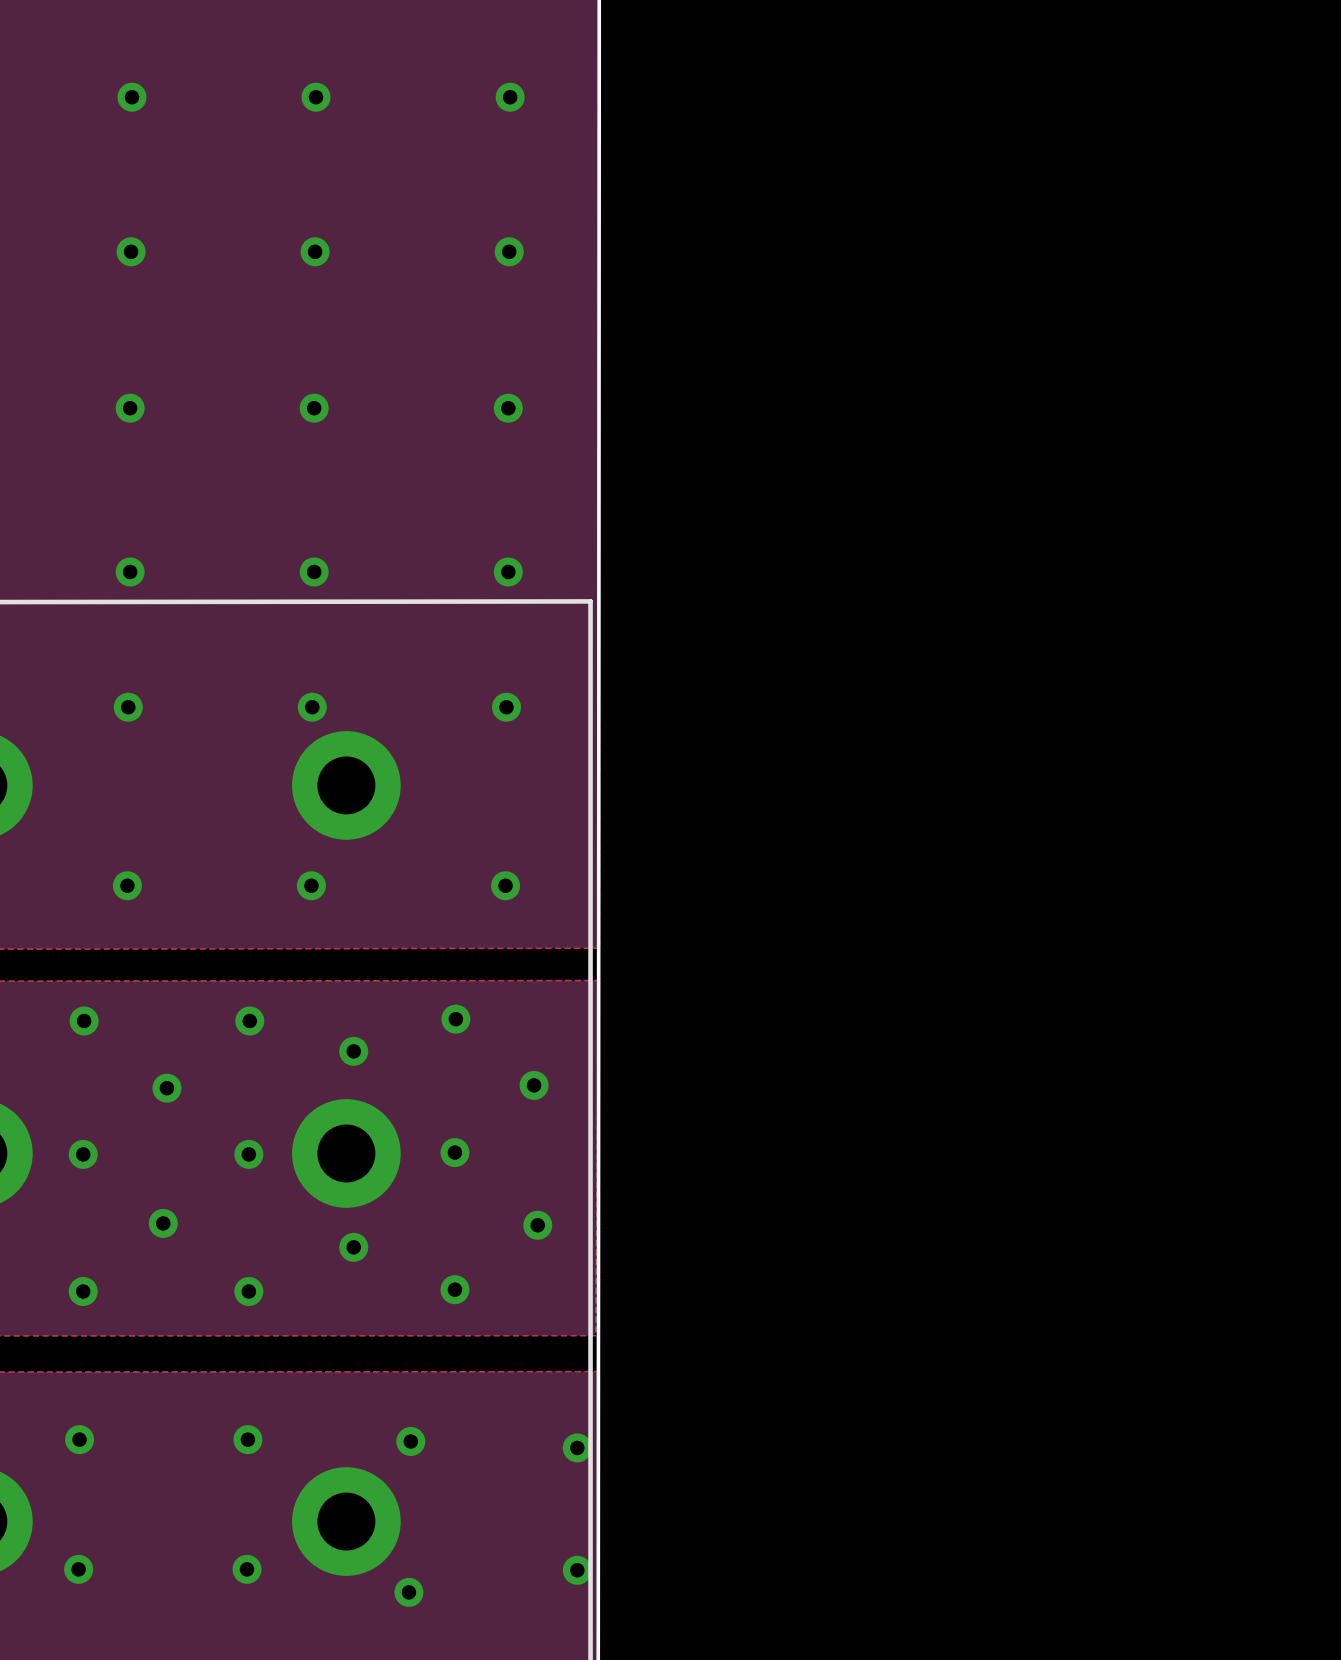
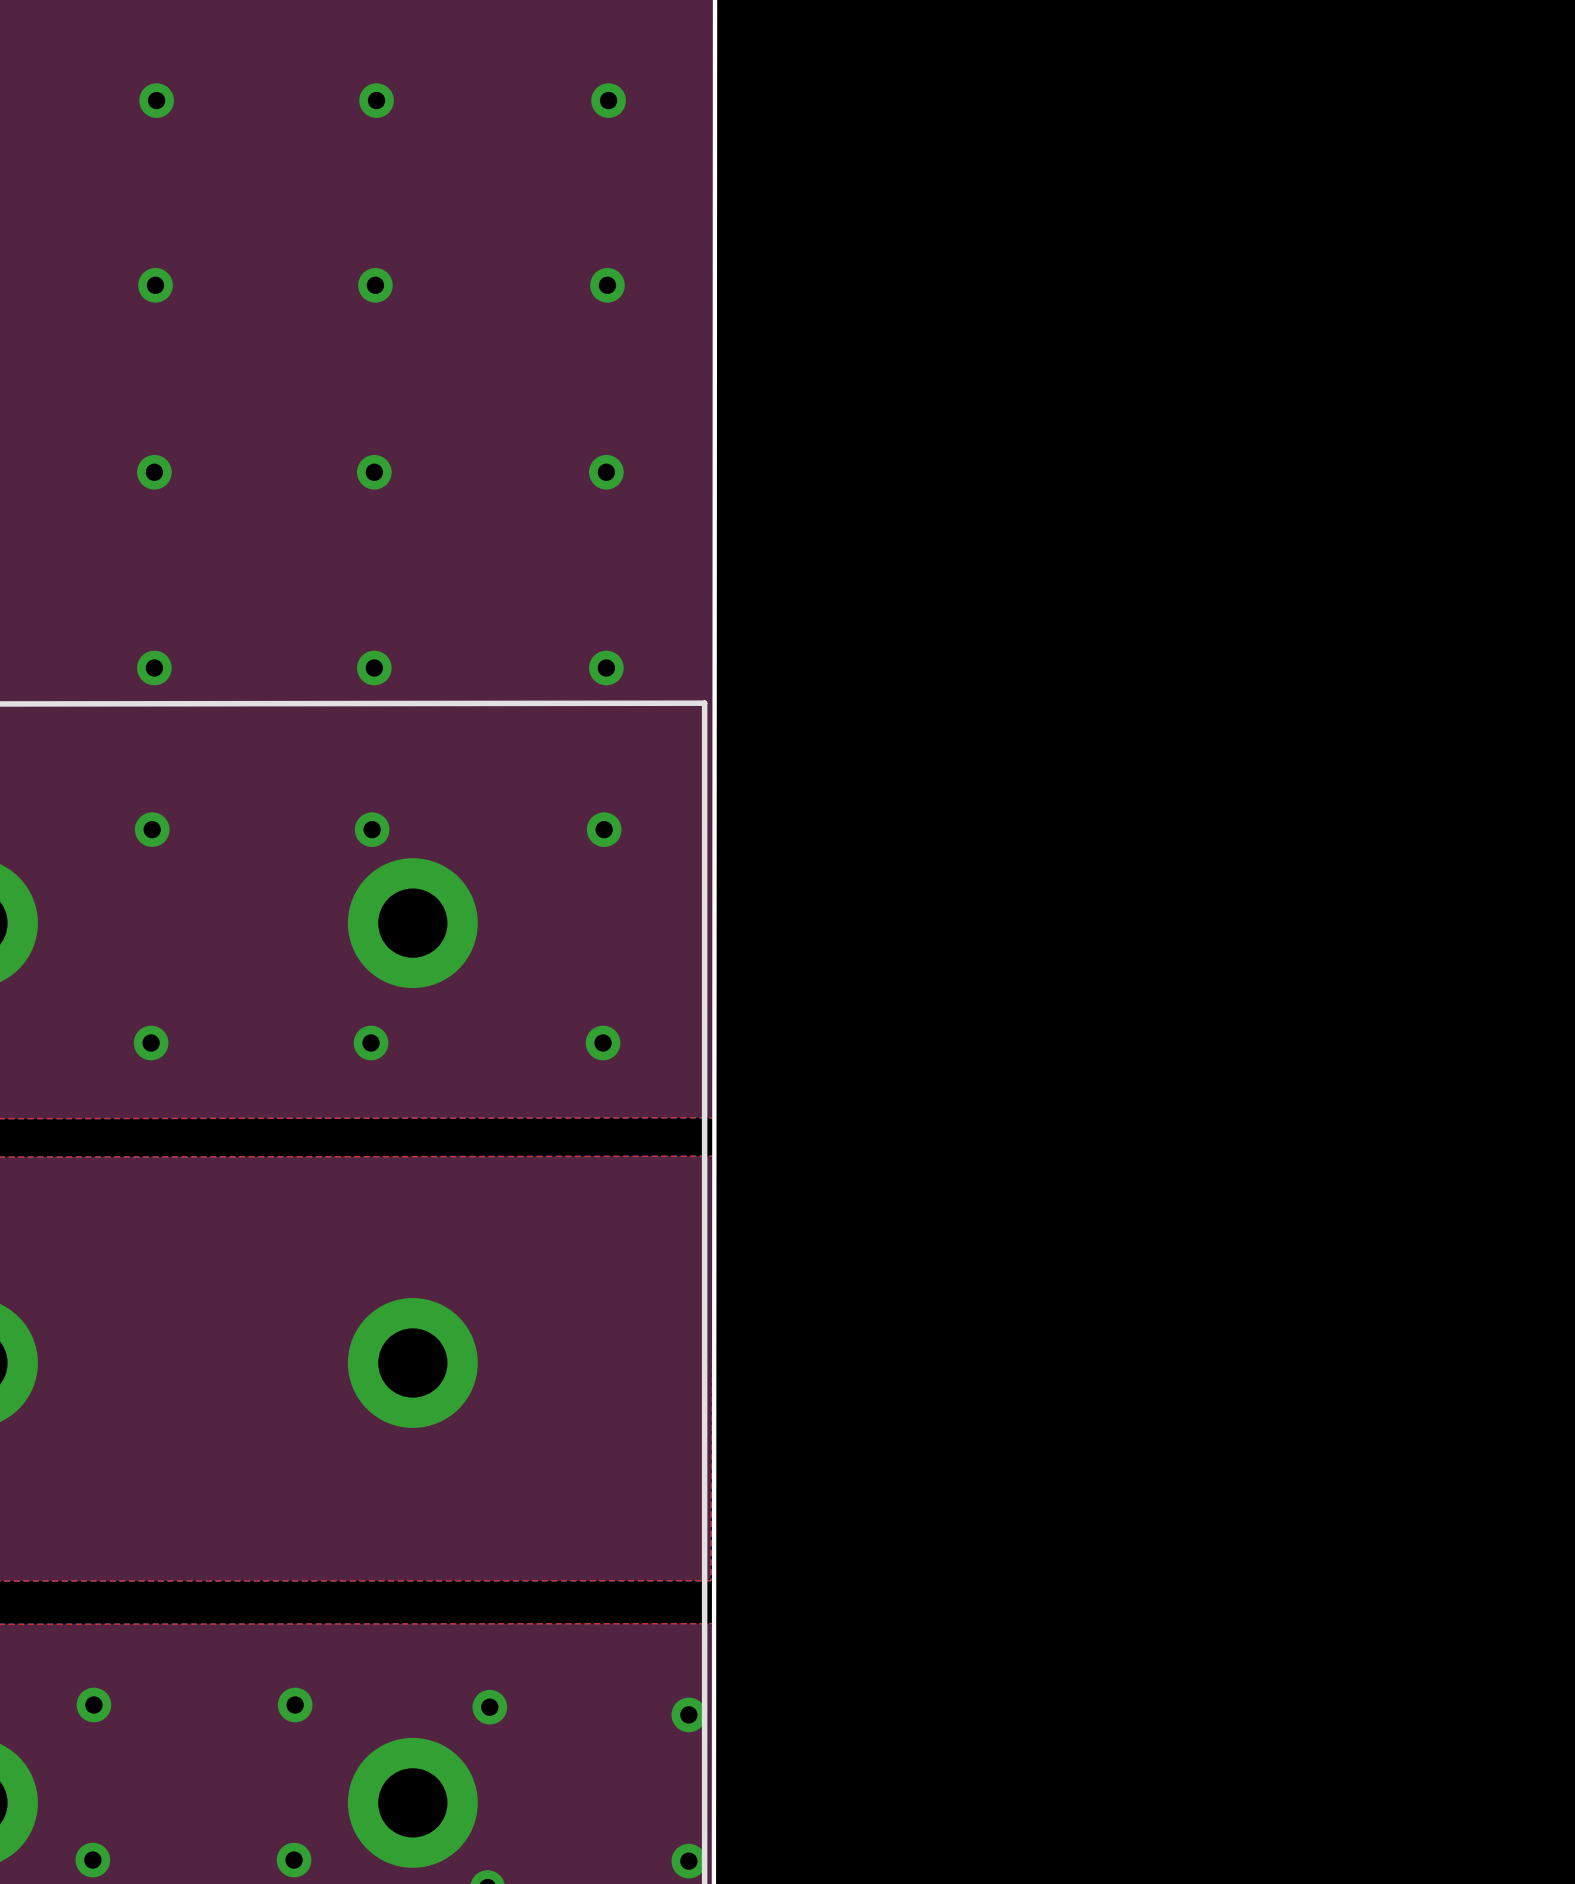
via: (455, 1019) -> none
via: (84, 1020) -> none
via: (249, 1020) -> none
via: (353, 1051) -> none
via: (534, 1085) -> none
via: (166, 1088) -> none
via: (454, 1152) -> none
via: (83, 1154) -> none
via: (248, 1154) -> none
via: (163, 1223) -> none
via: (537, 1225) -> none
via: (353, 1247) -> none
via: (454, 1289) -> none
via: (83, 1291) -> none
via: (248, 1291) -> none

